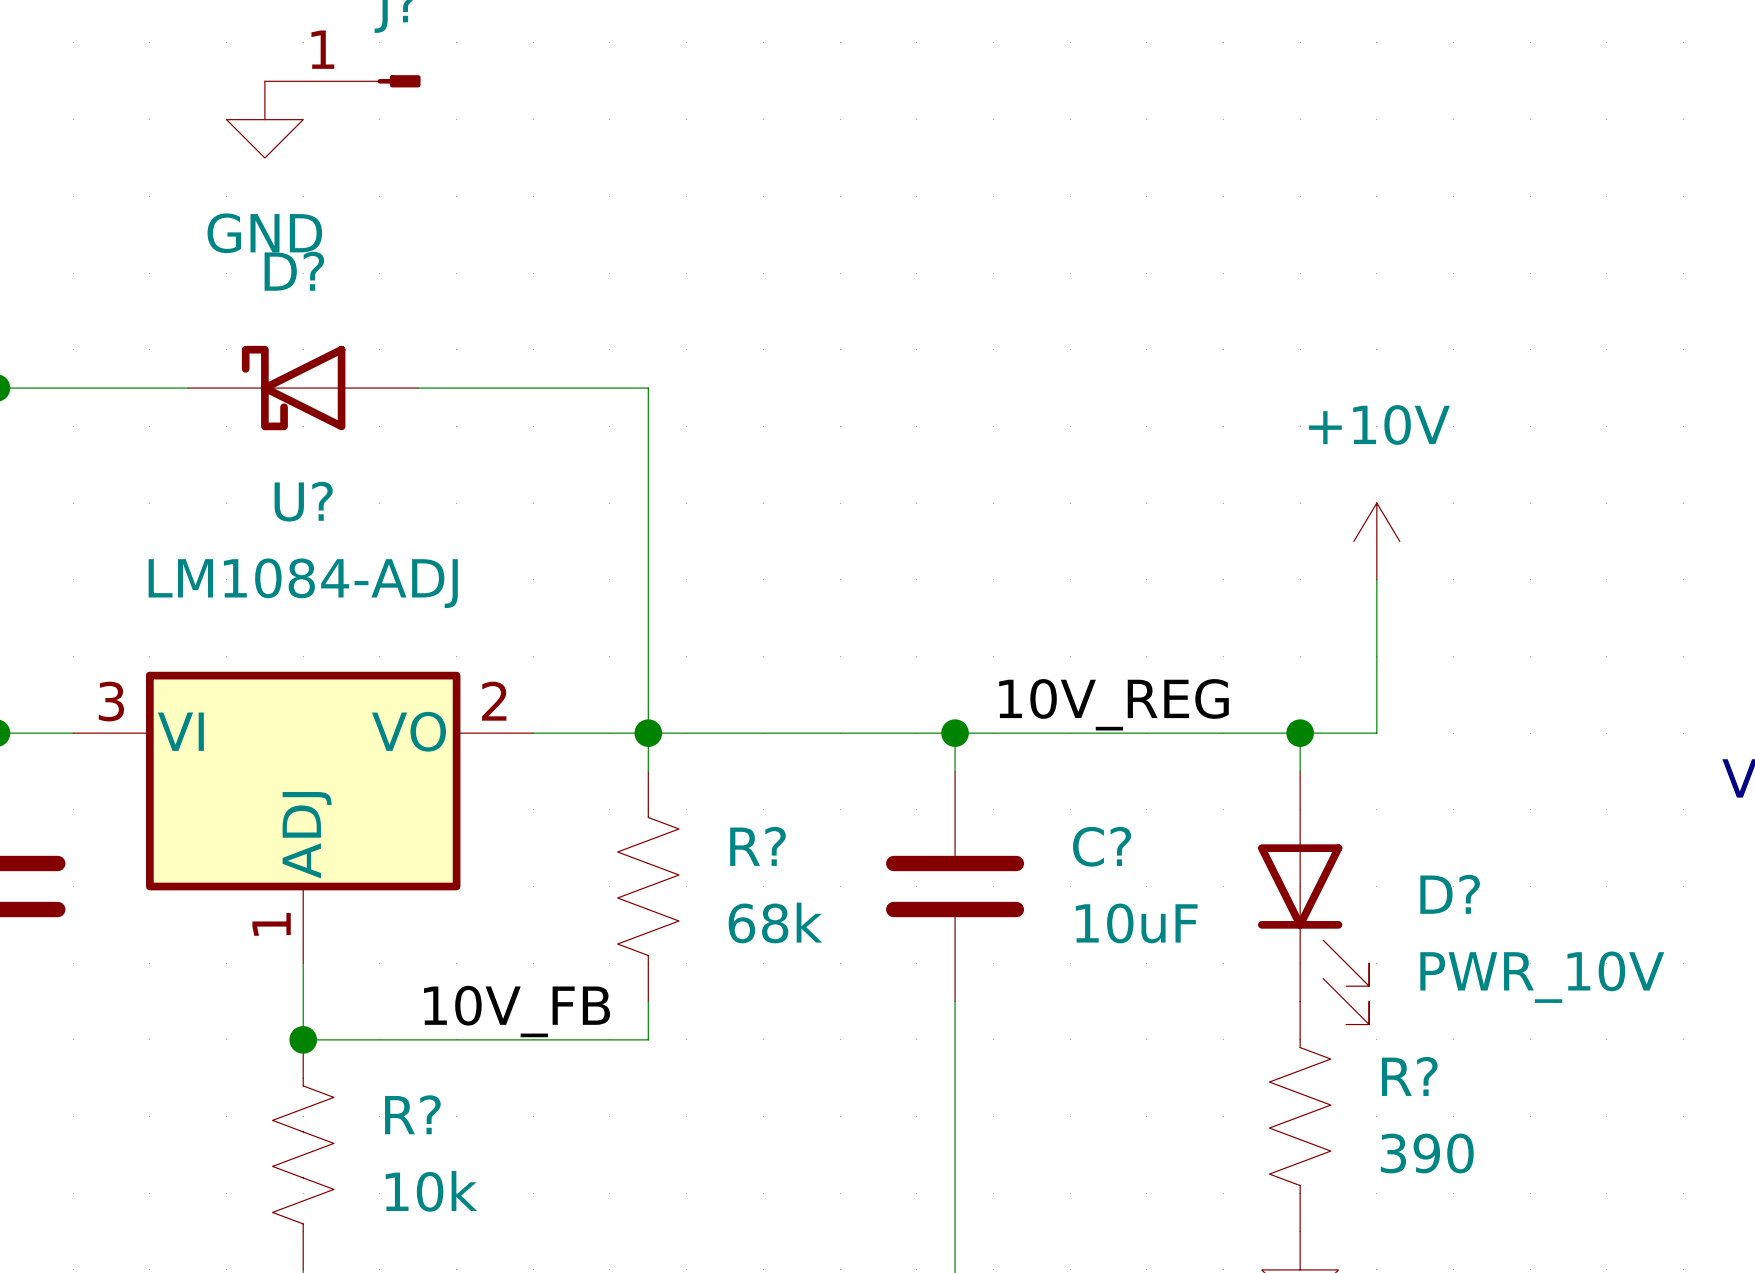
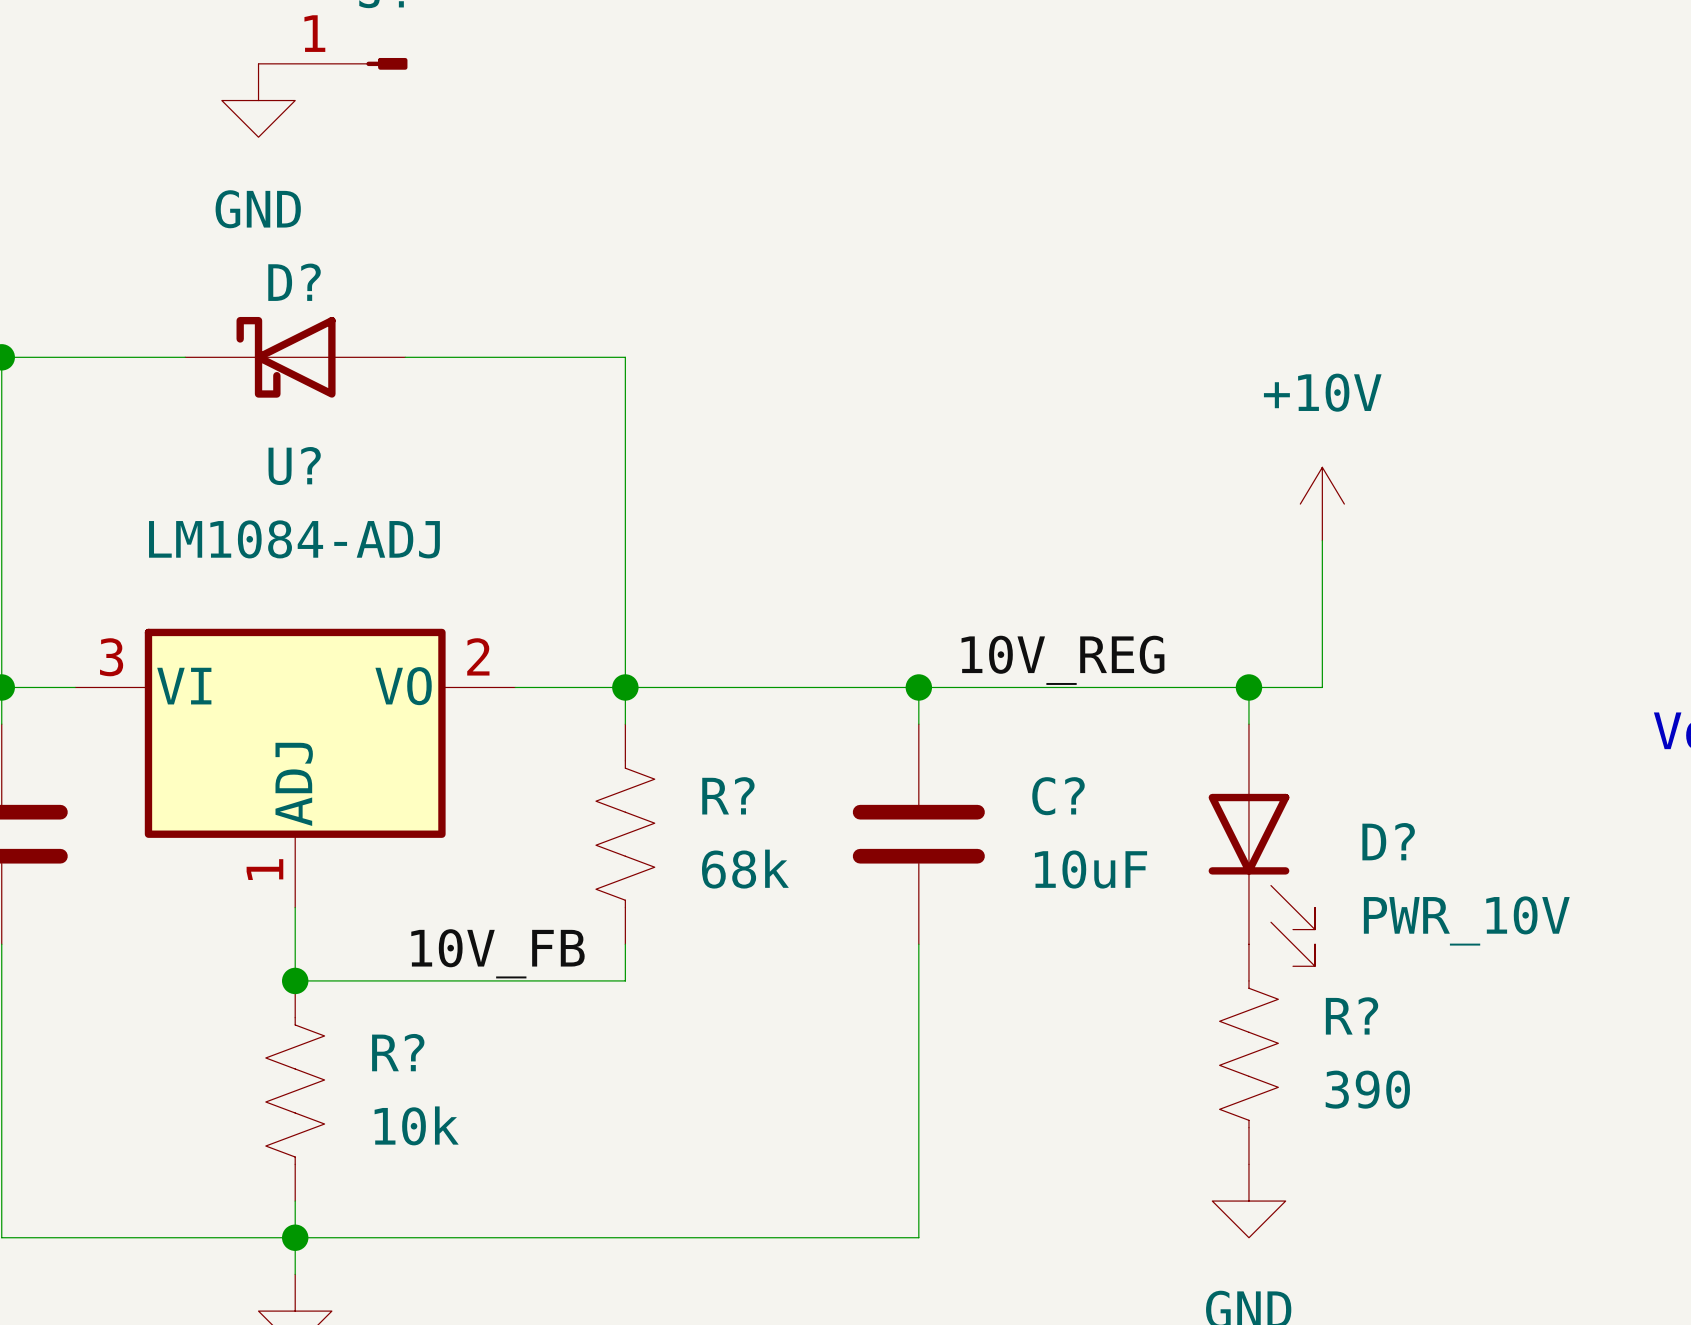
D? name position: D? (294, 271) -> D? (294, 282)

